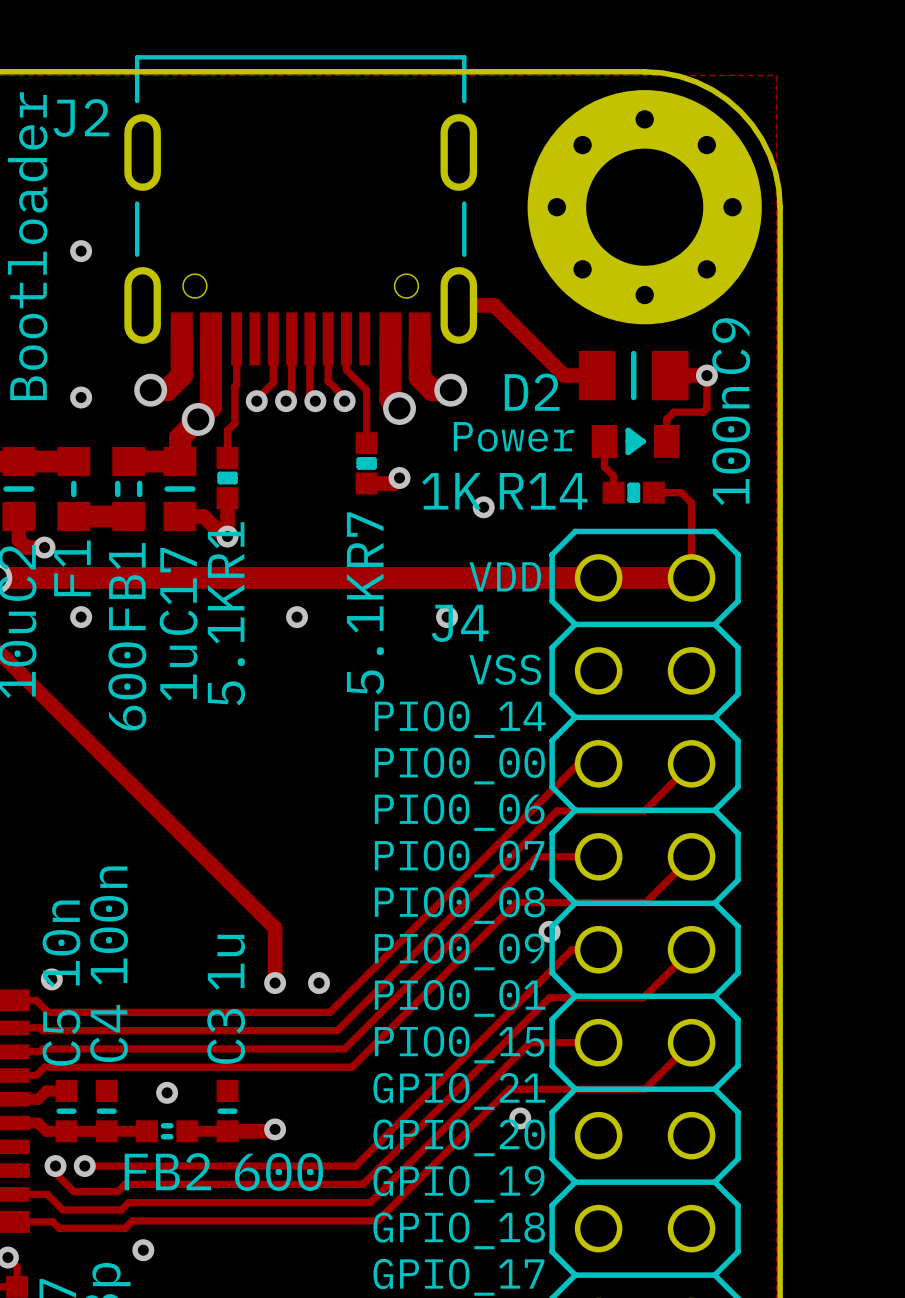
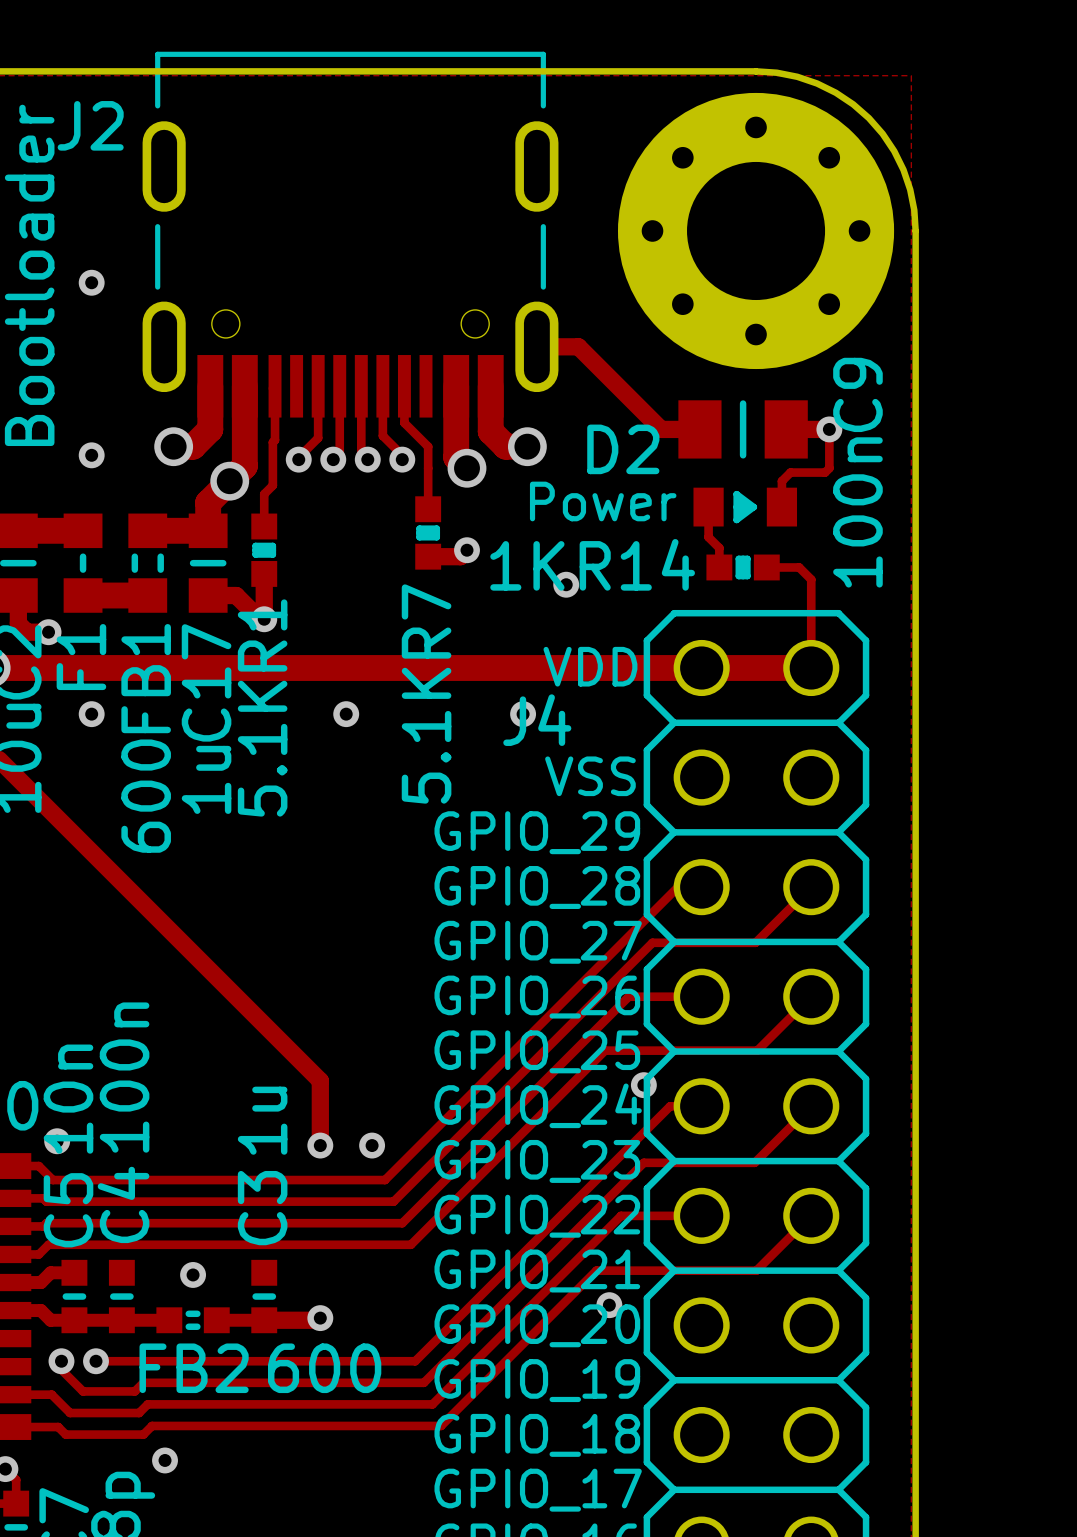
J4 text: PIO0_14 (460, 719) -> GPIO_29 (537, 832)
J4 text: PIO0_00 (459, 766) -> GPIO_28 (537, 887)
J4 text: PIO0_06 (459, 812) -> GPIO_27 (538, 942)
J4 text: PIO0_07 (459, 858) -> GPIO_26 (537, 997)
J4 text: PIO0_08 (459, 905) -> GPIO_25 (537, 1051)
J4 text: PIO0_09 (459, 951) -> GPIO_24 (538, 1105)
J4 text: PIO0_01 (460, 998) -> GPIO_23 (537, 1161)
J4 text: PIO0_15 (459, 1044) -> GPIO_22 (537, 1216)

